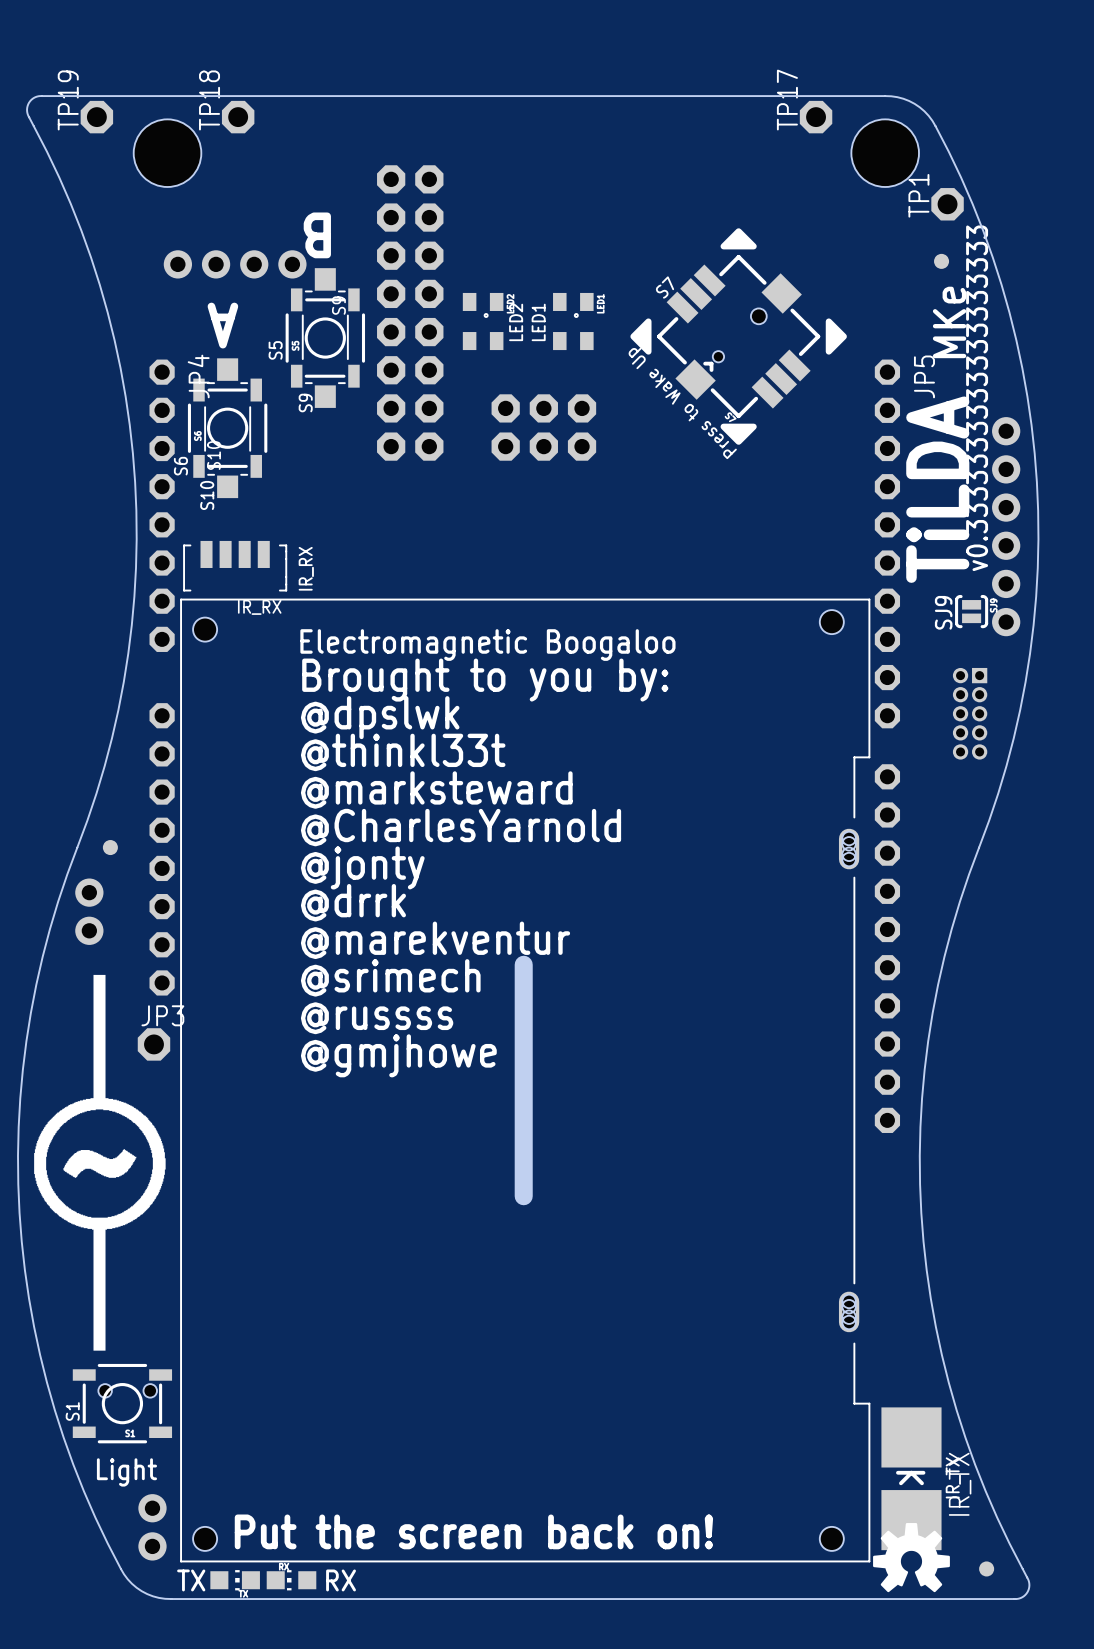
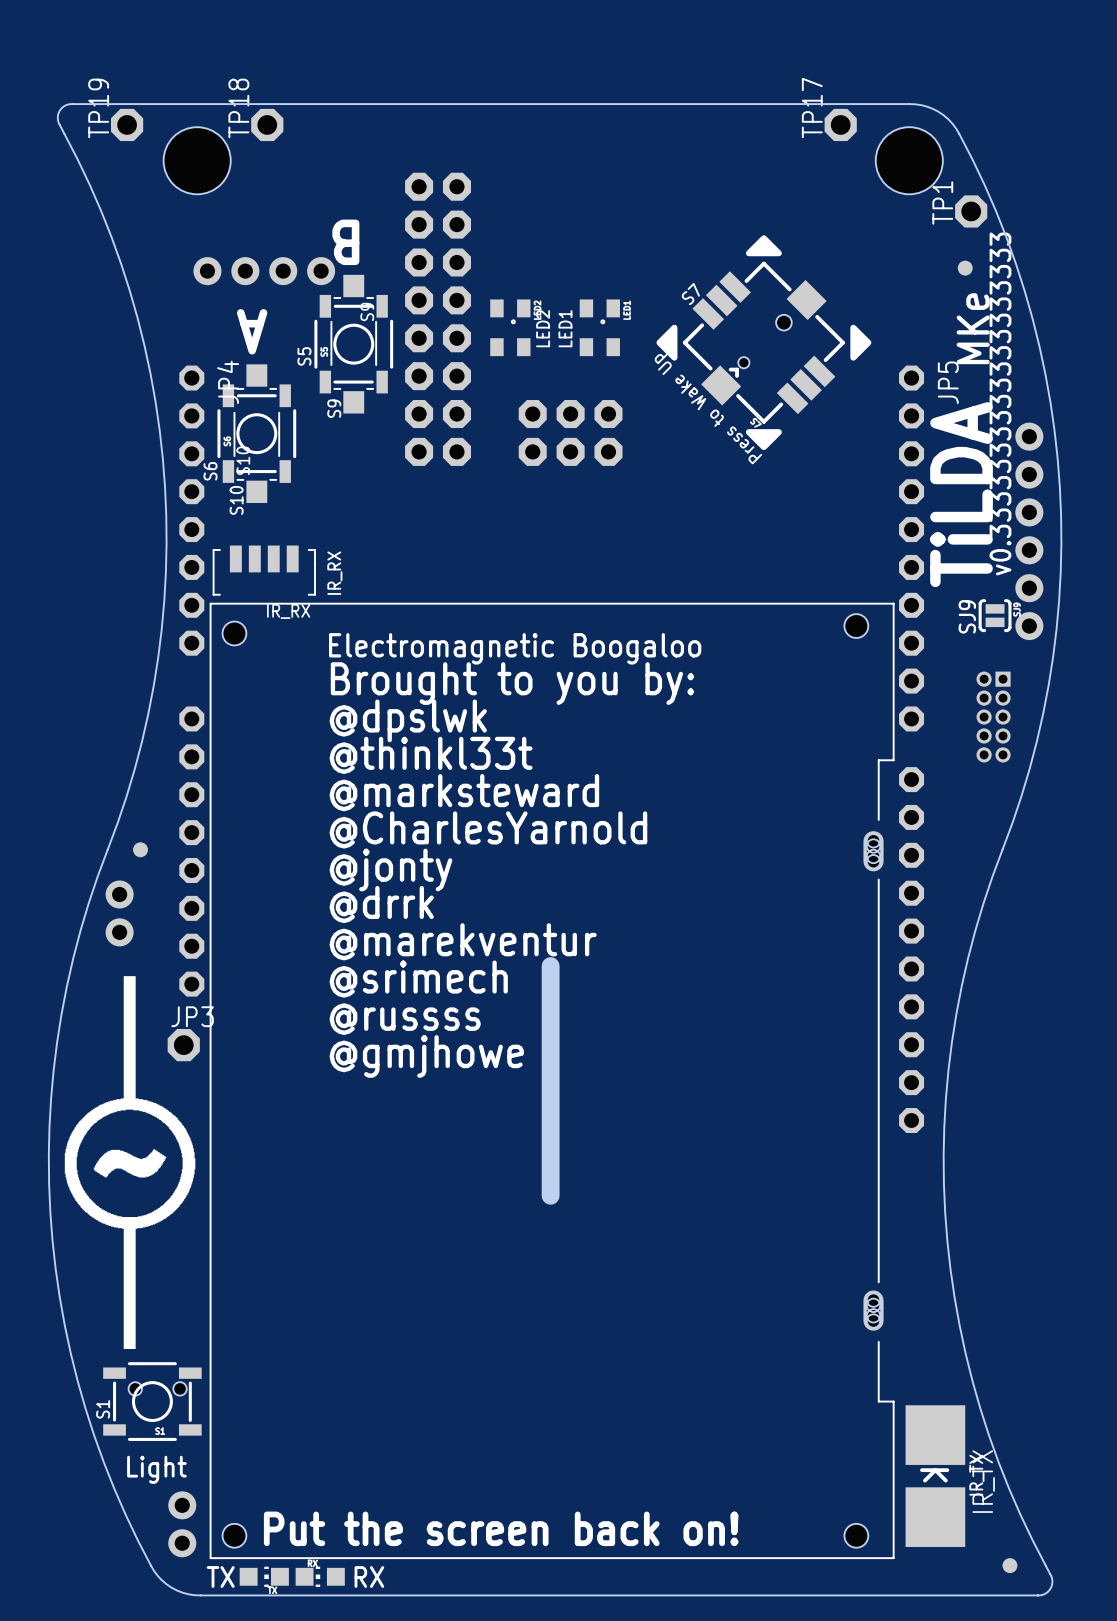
drawing: [873, 1523, 950, 1593] -> none

